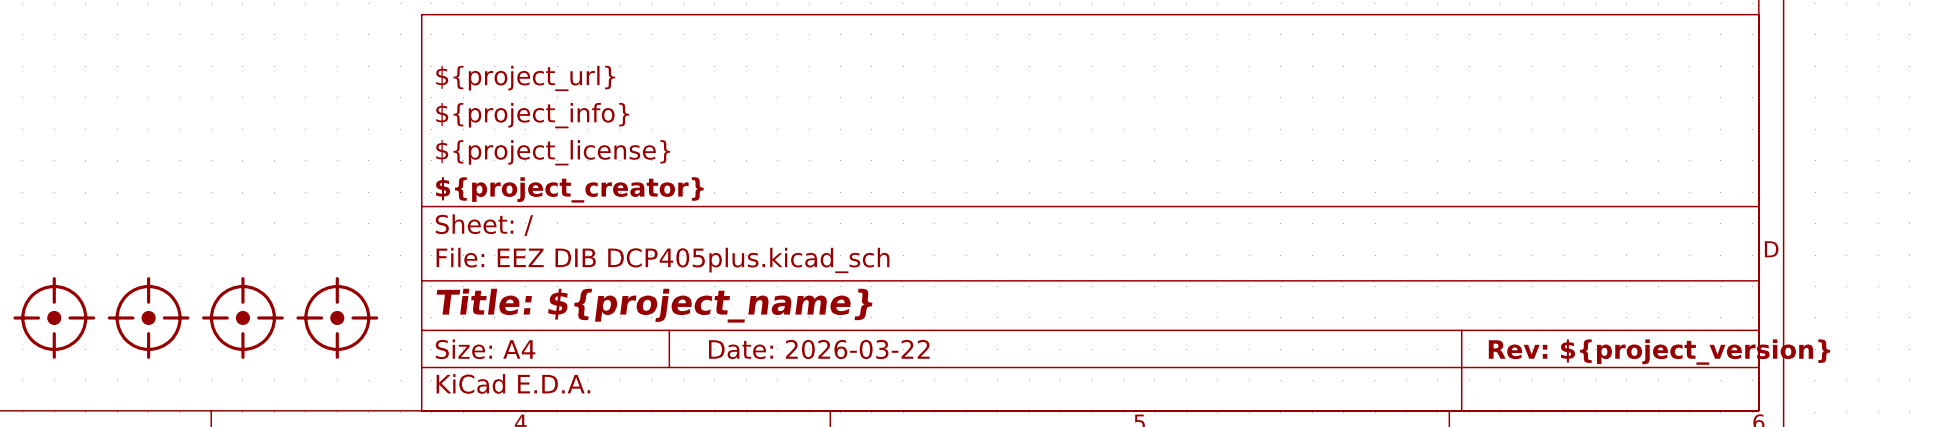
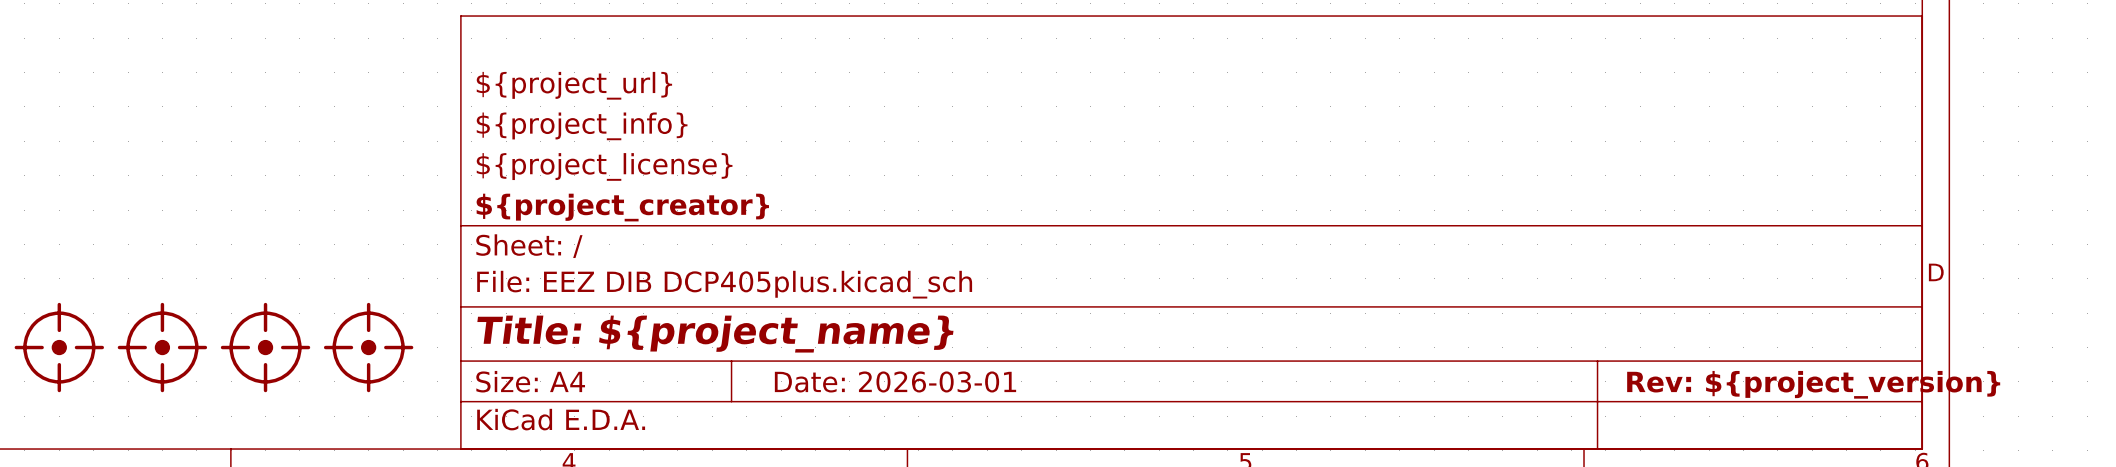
title block: Date: 2026-03-22 (819, 349) -> Date: 2026-03-01 (895, 381)

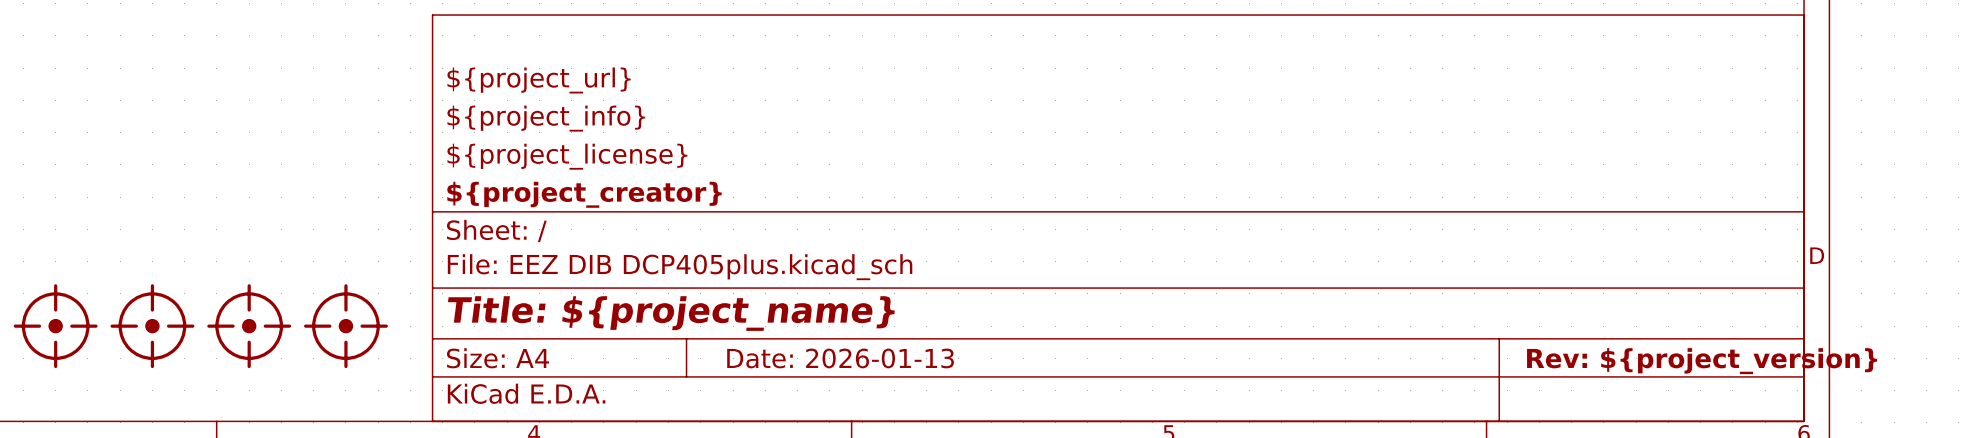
title block: Date: 2026-03-01 (895, 381) -> Date: 2026-01-13 (840, 358)

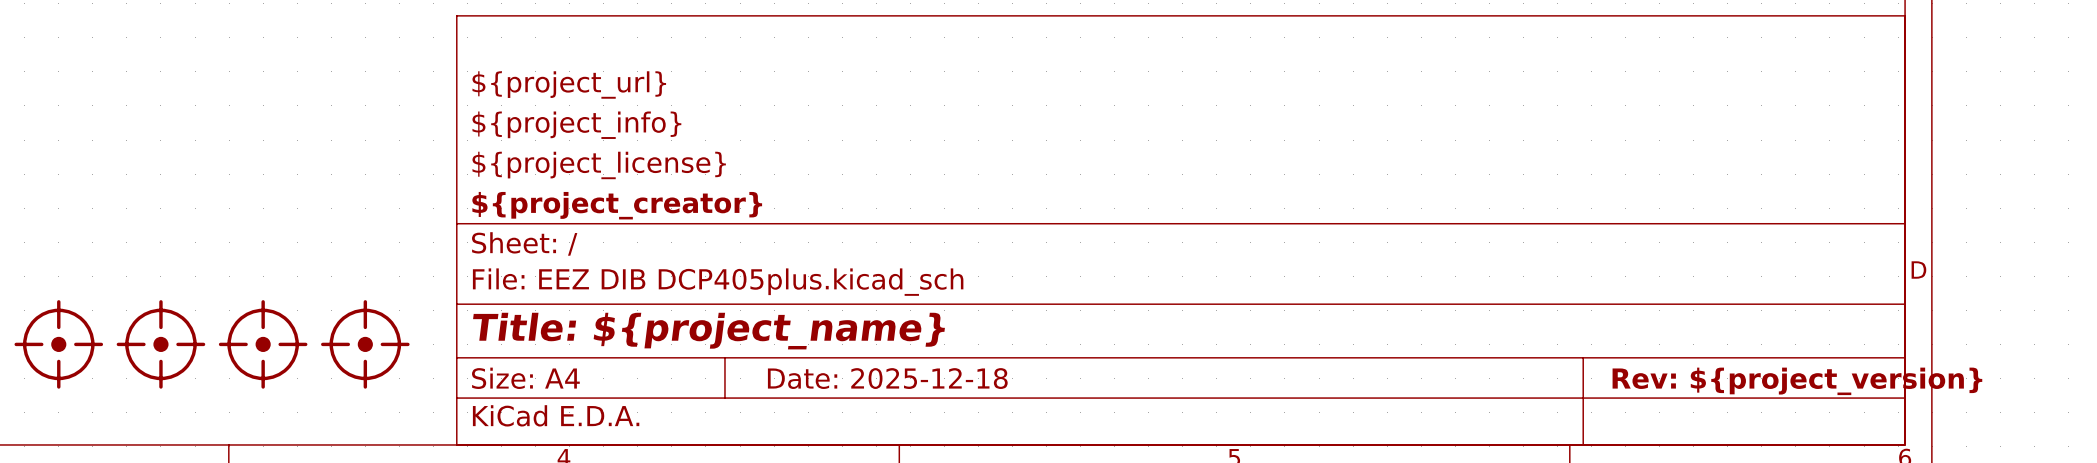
title block: Date: 2026-01-13 (840, 358) -> Date: 2025-12-18 (887, 378)

